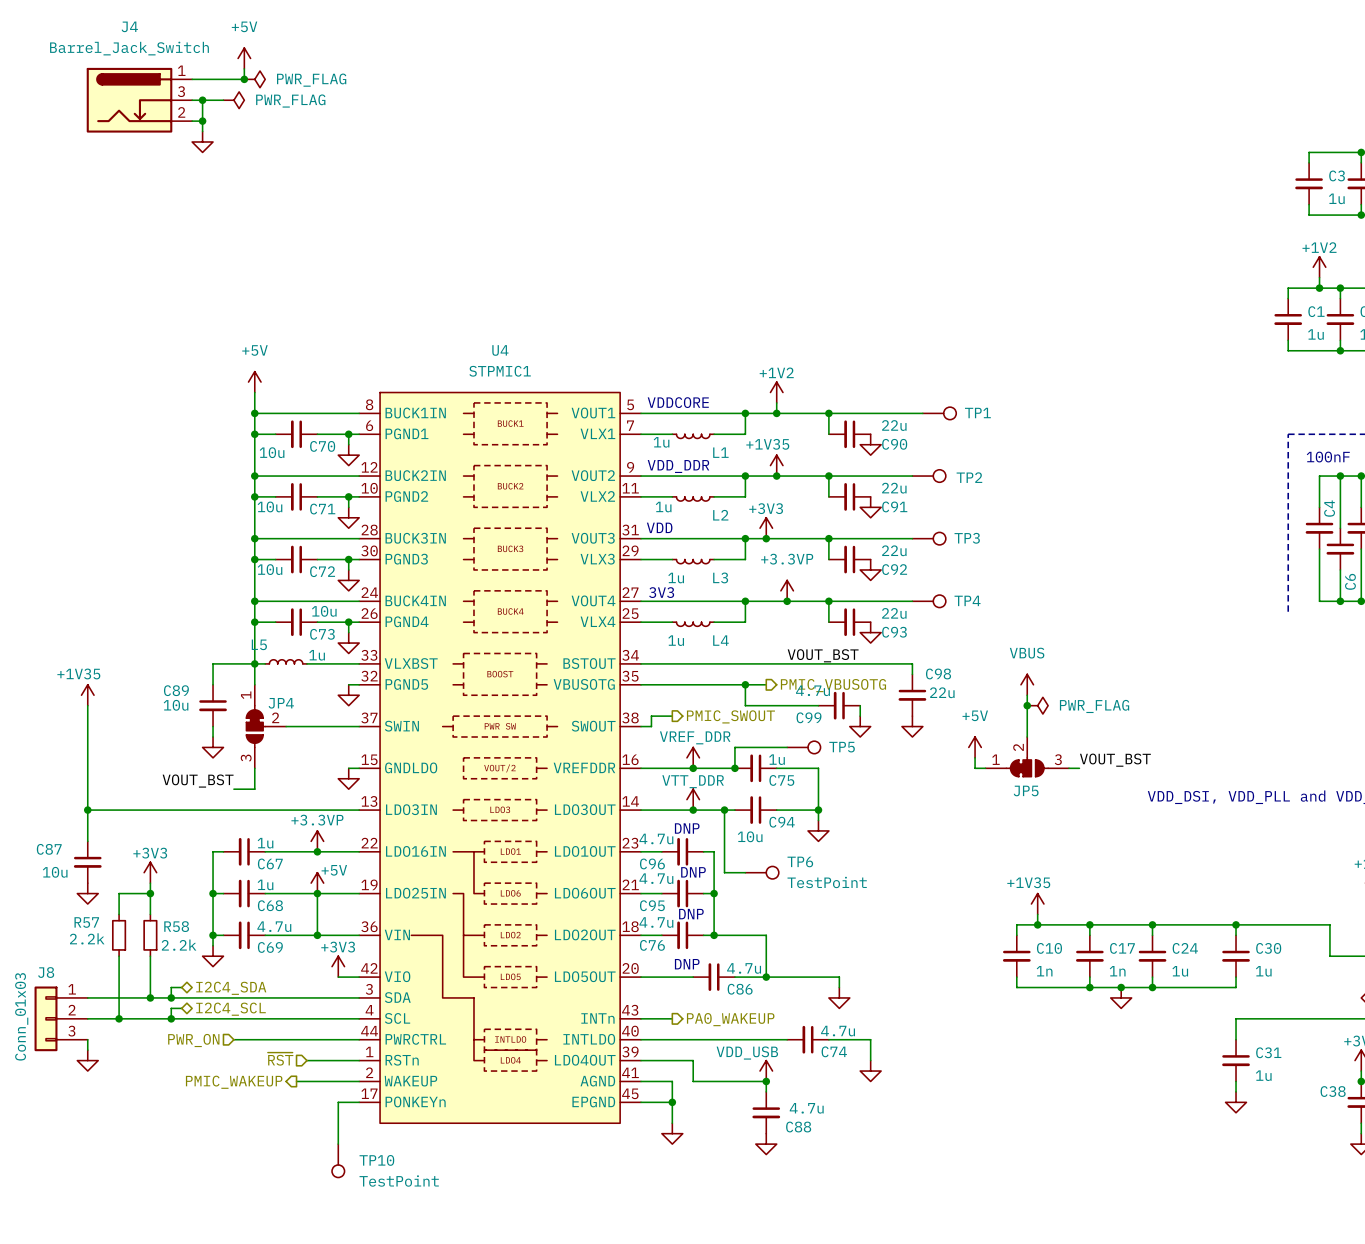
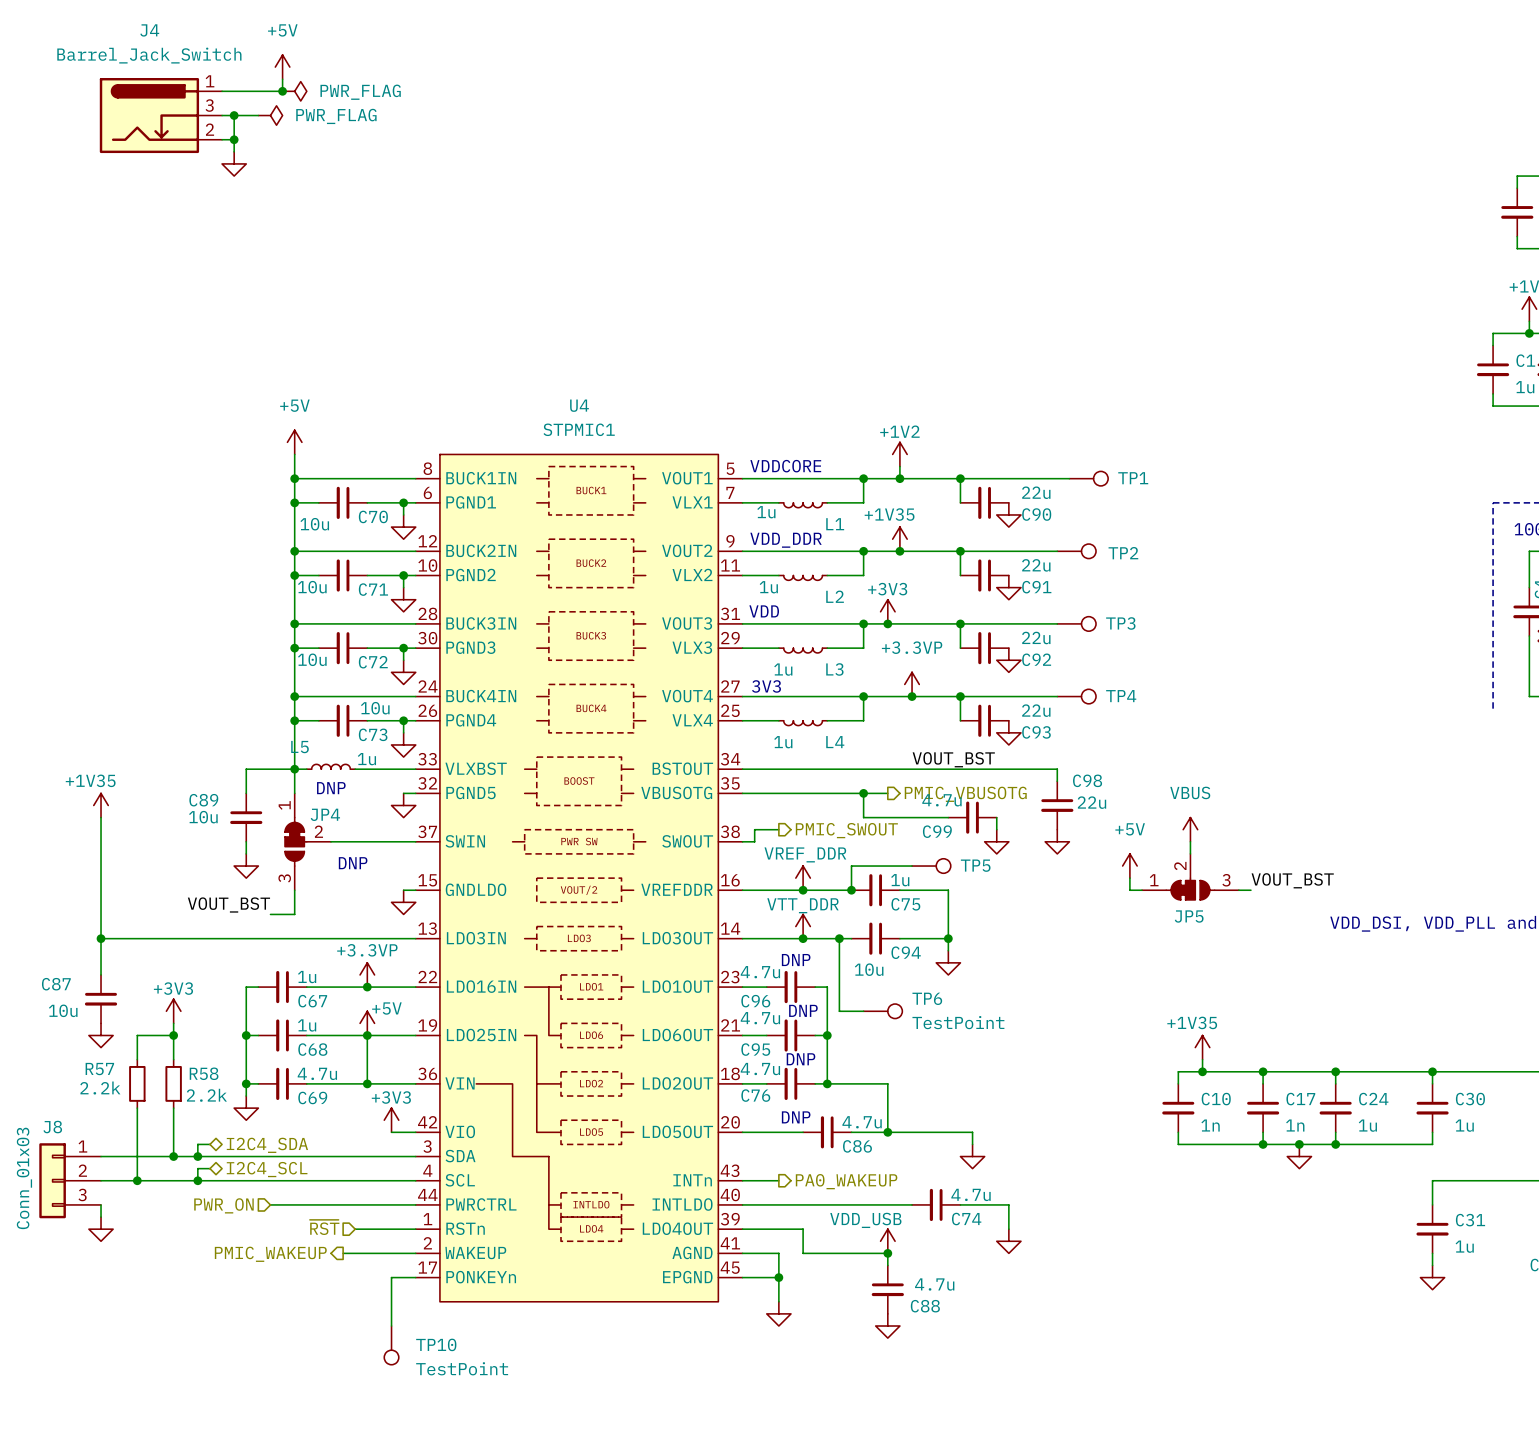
text: none -> DNP (331, 788)
power symbol position: VBUS (1027, 684) -> VBUS (1190, 829)
junction: (1027, 705) -> none
power symbol: PWR_FLAG (1037, 705) -> none
text: none -> DNP (353, 863)

